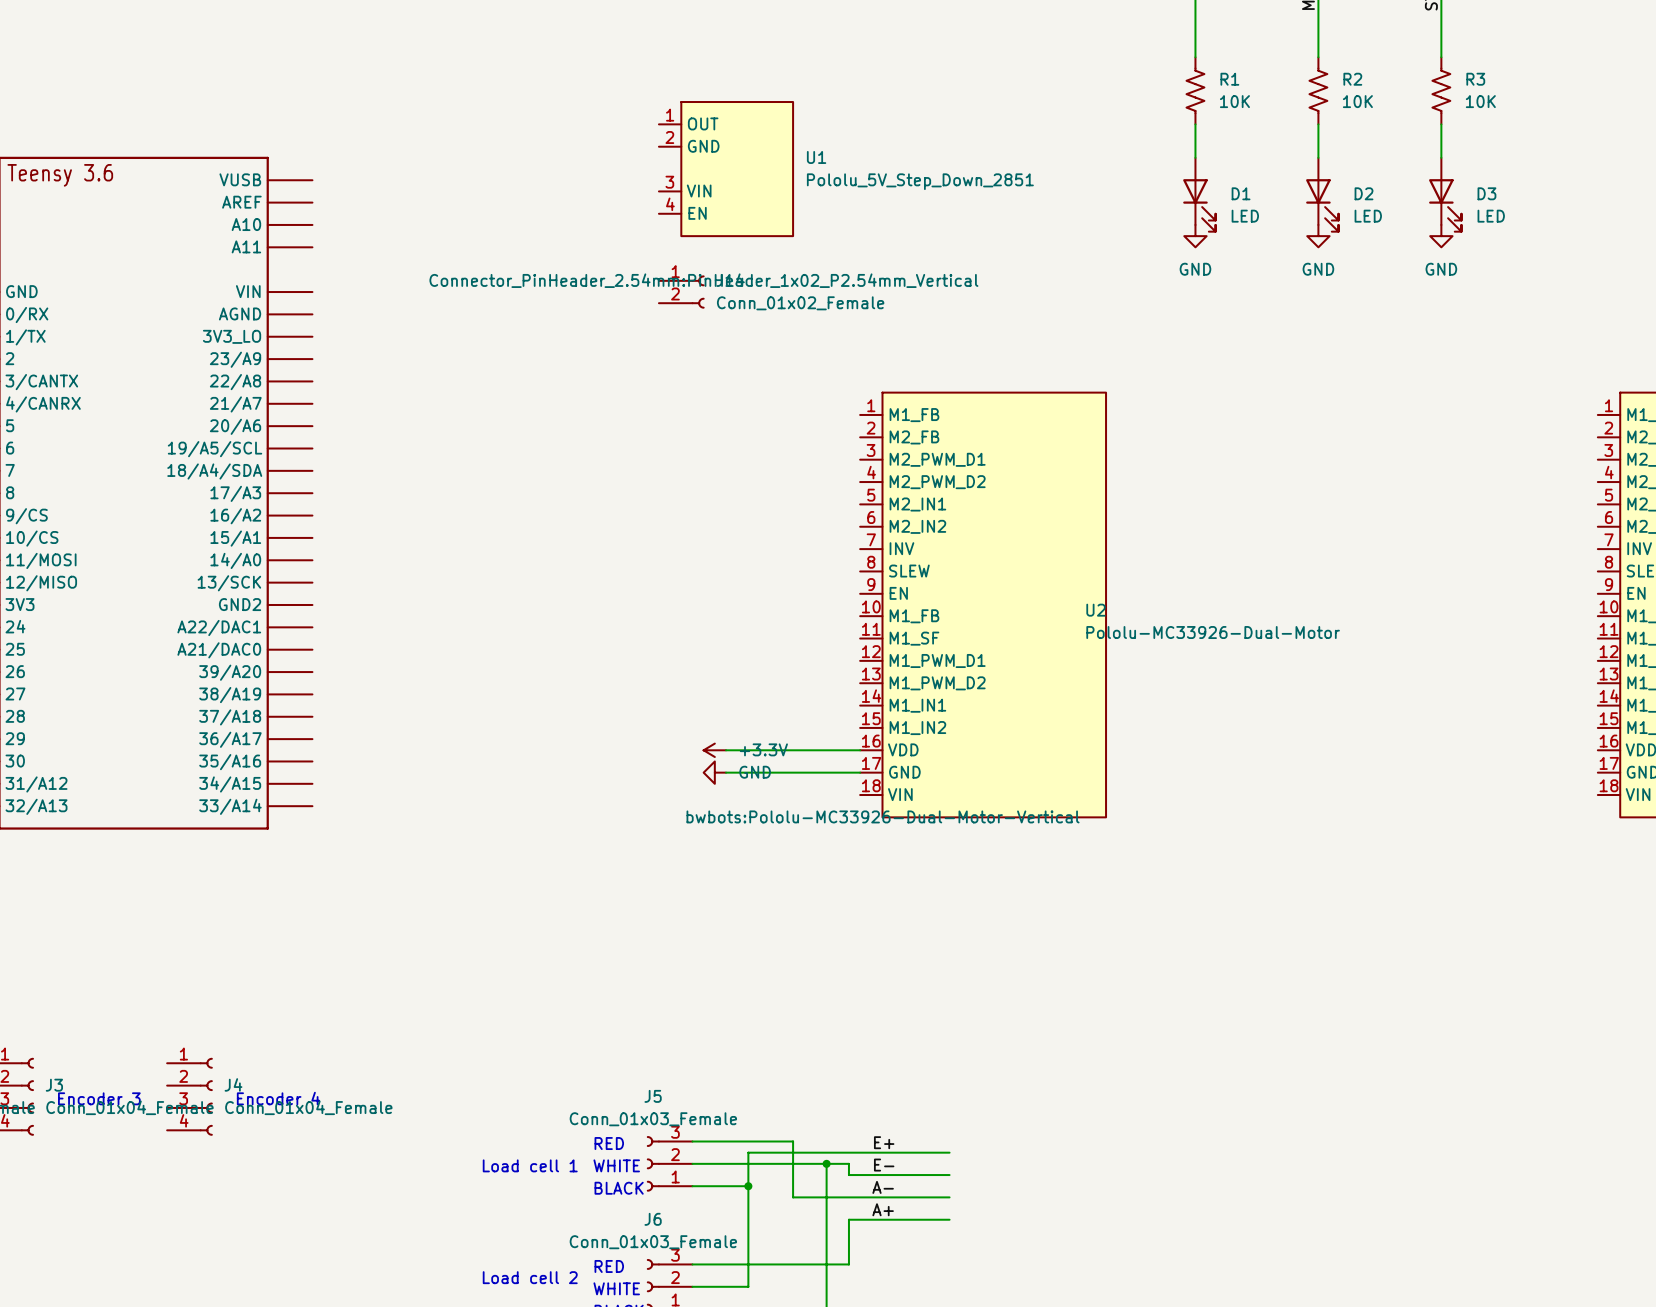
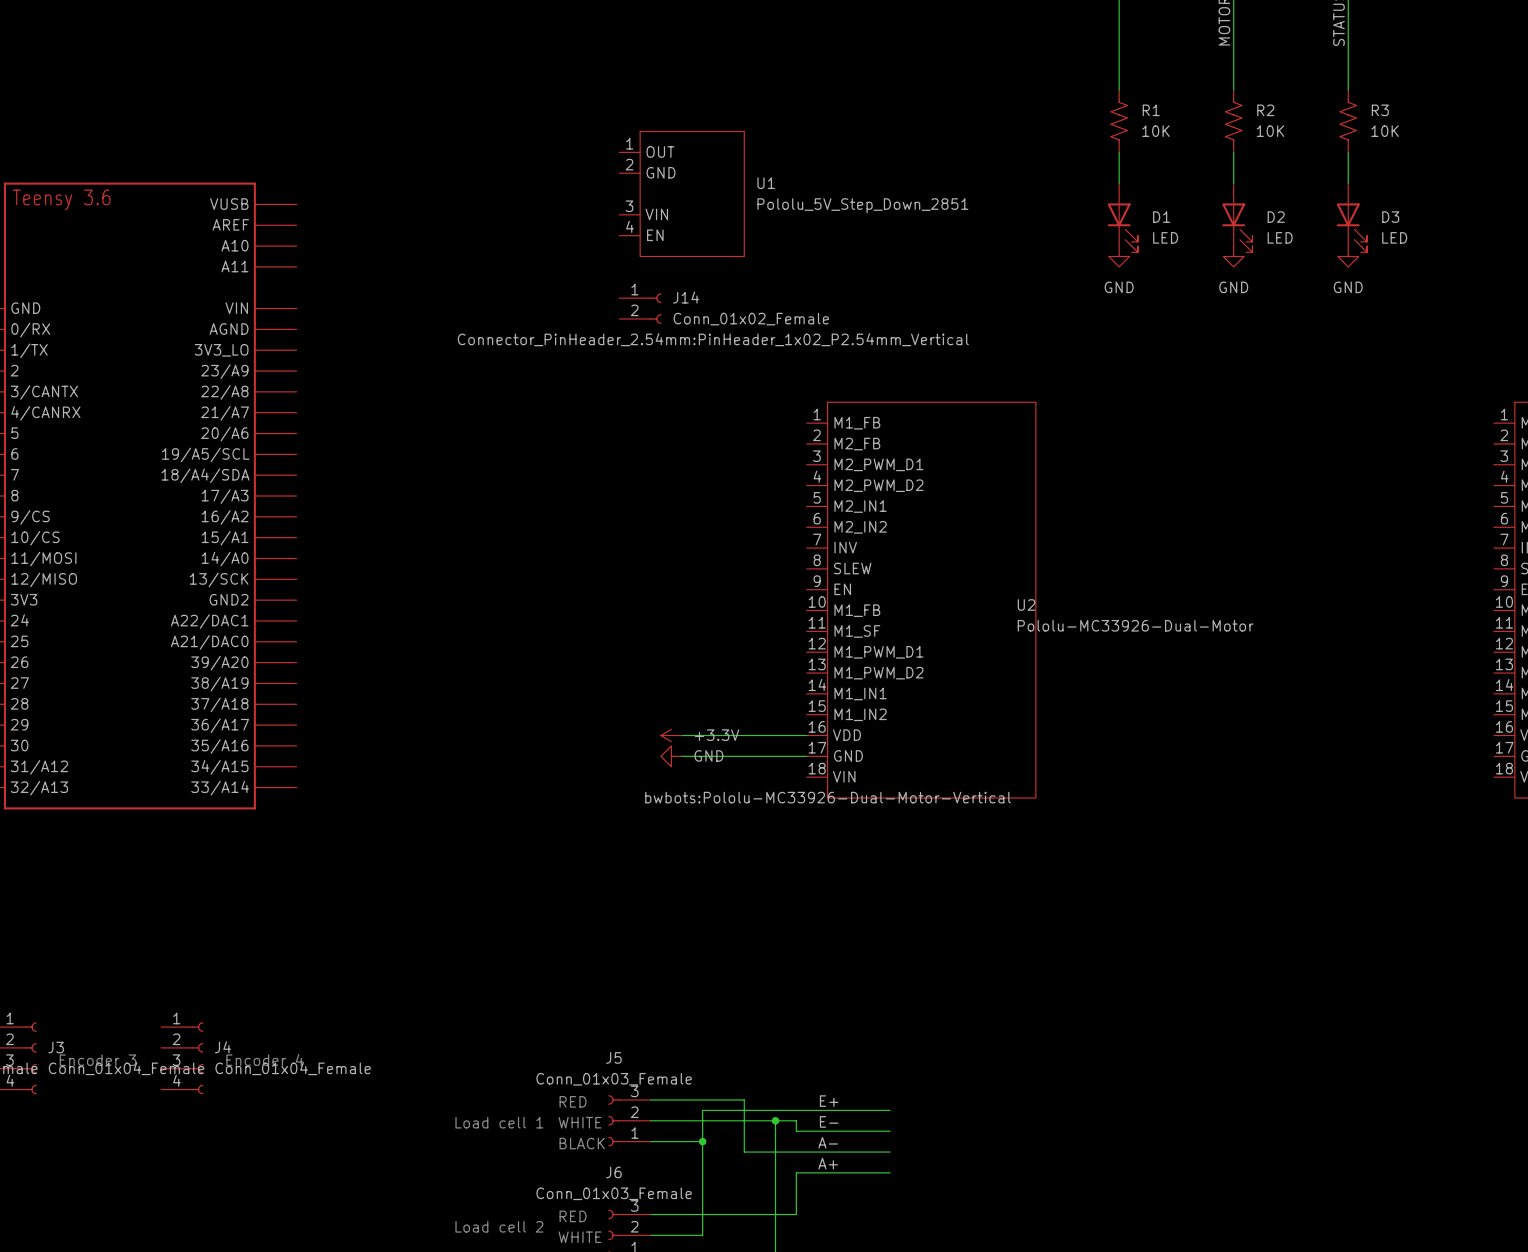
J14 text position: Connector_PinHeader_2.54mm:PinHeader_1x02_P2.54mm_Vertical (703, 280) -> Connector_PinHeader_2.54mm:PinHeader_1x02_P2.54mm_Vertical (713, 339)

